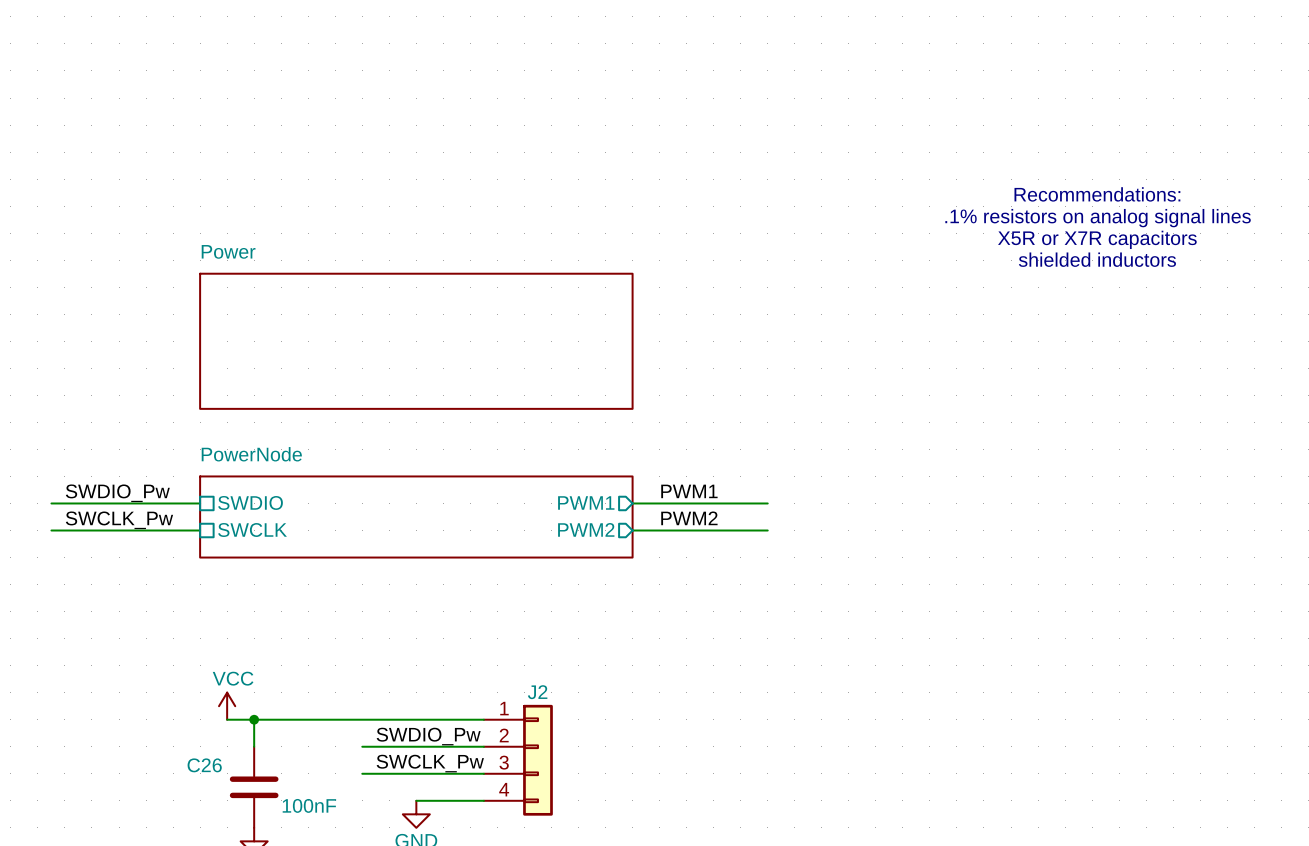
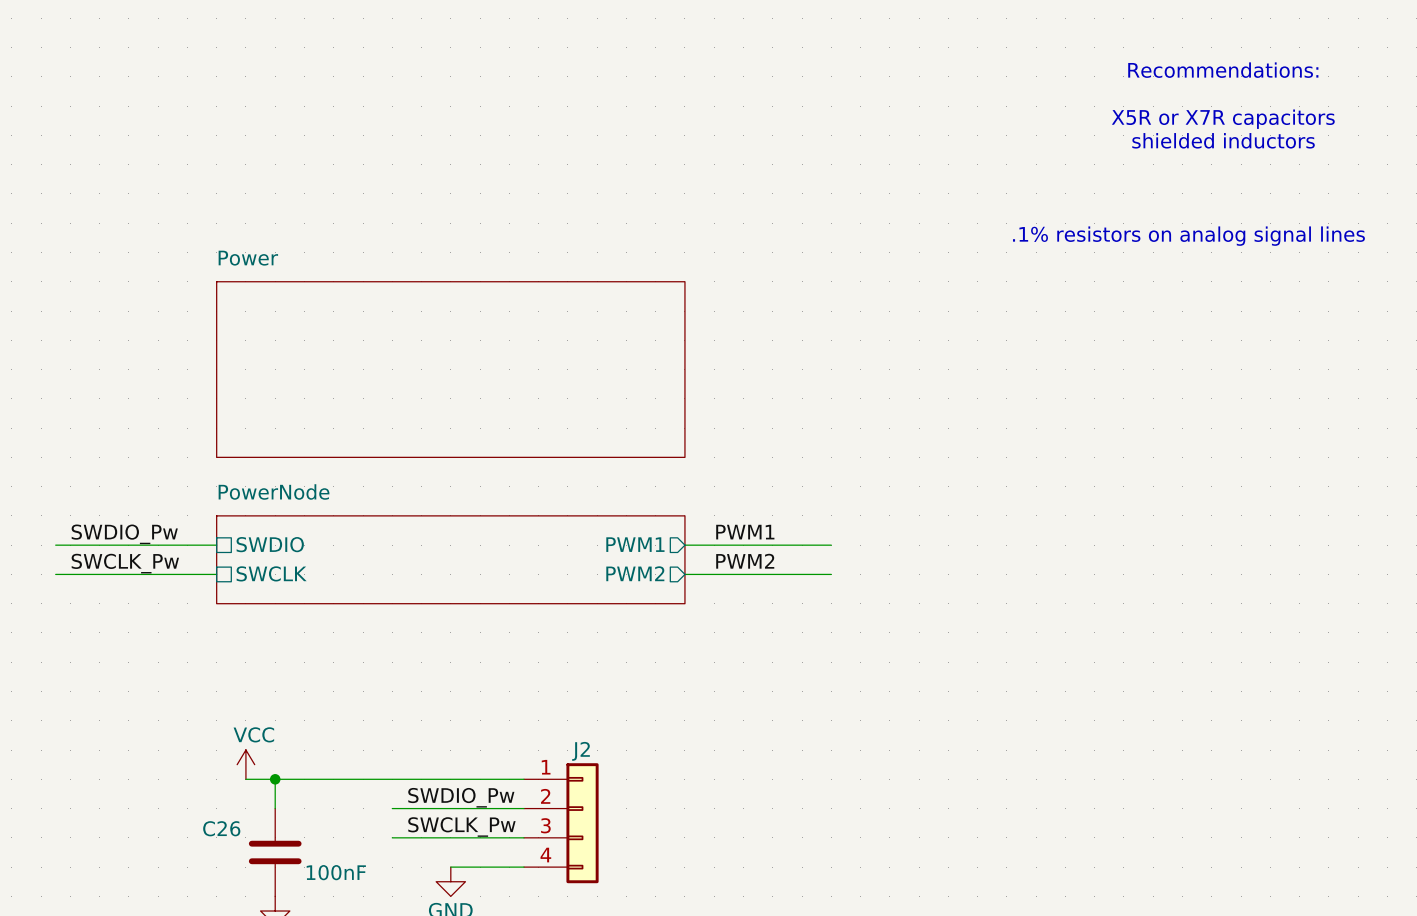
text position: Recommendations: (1097, 194) -> Recommendations: (1223, 70)
text position: X5R or X7R capacitors (1097, 239) -> X5R or X7R capacitors (1223, 119)
text position: shielded inductors (1097, 259) -> shielded inductors (1223, 140)
sheet Power shape: [200, 273, 633, 409] -> [216, 281, 685, 458]

